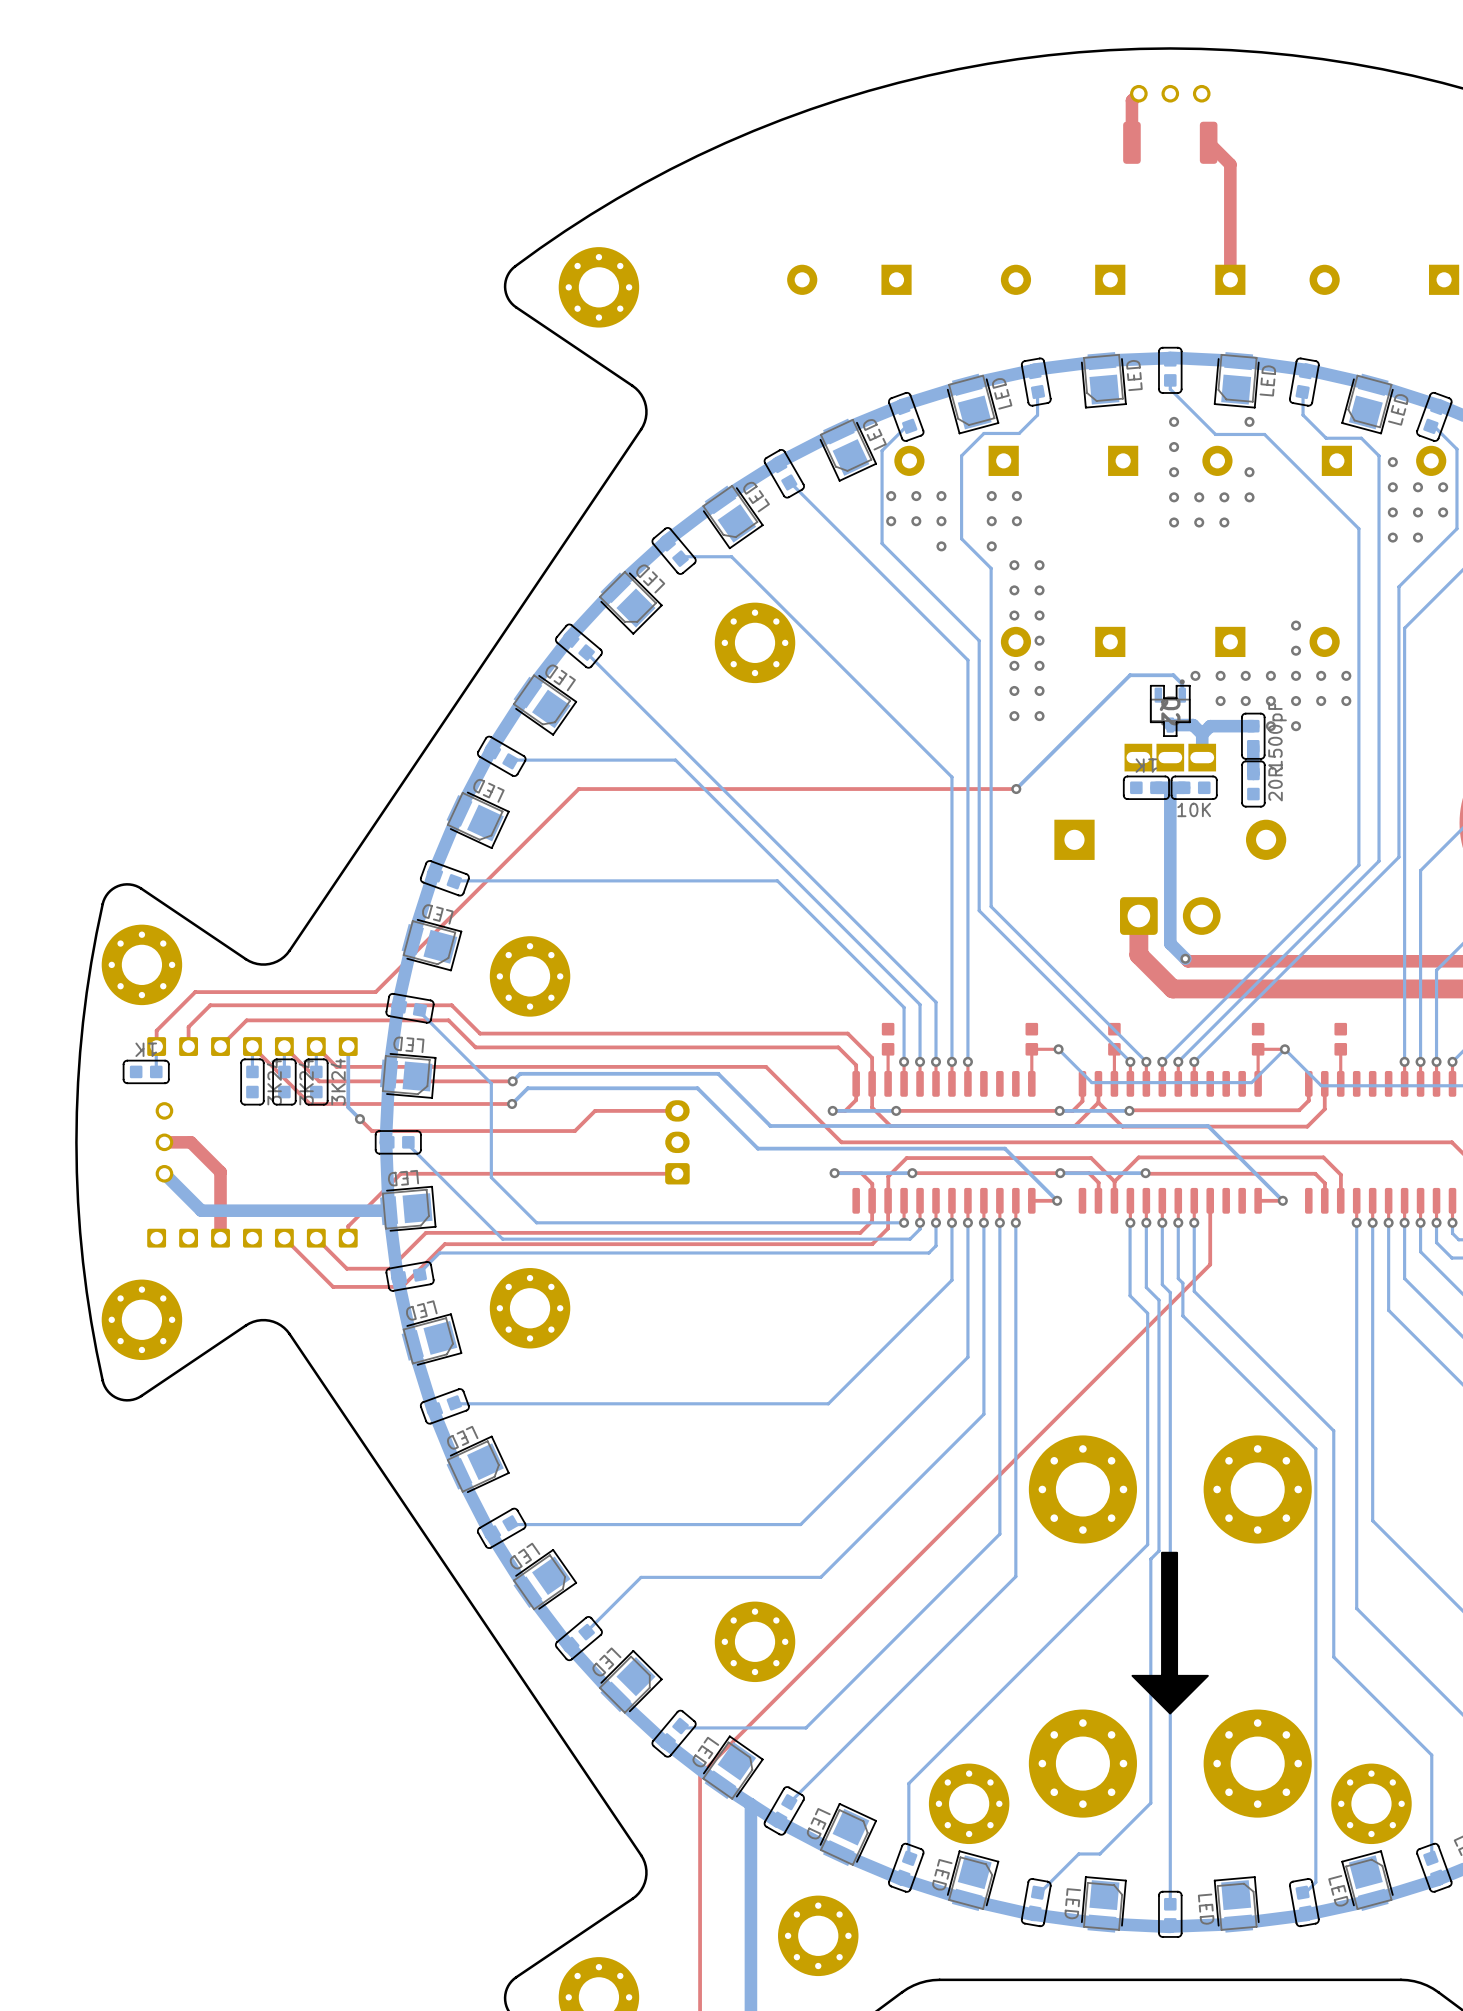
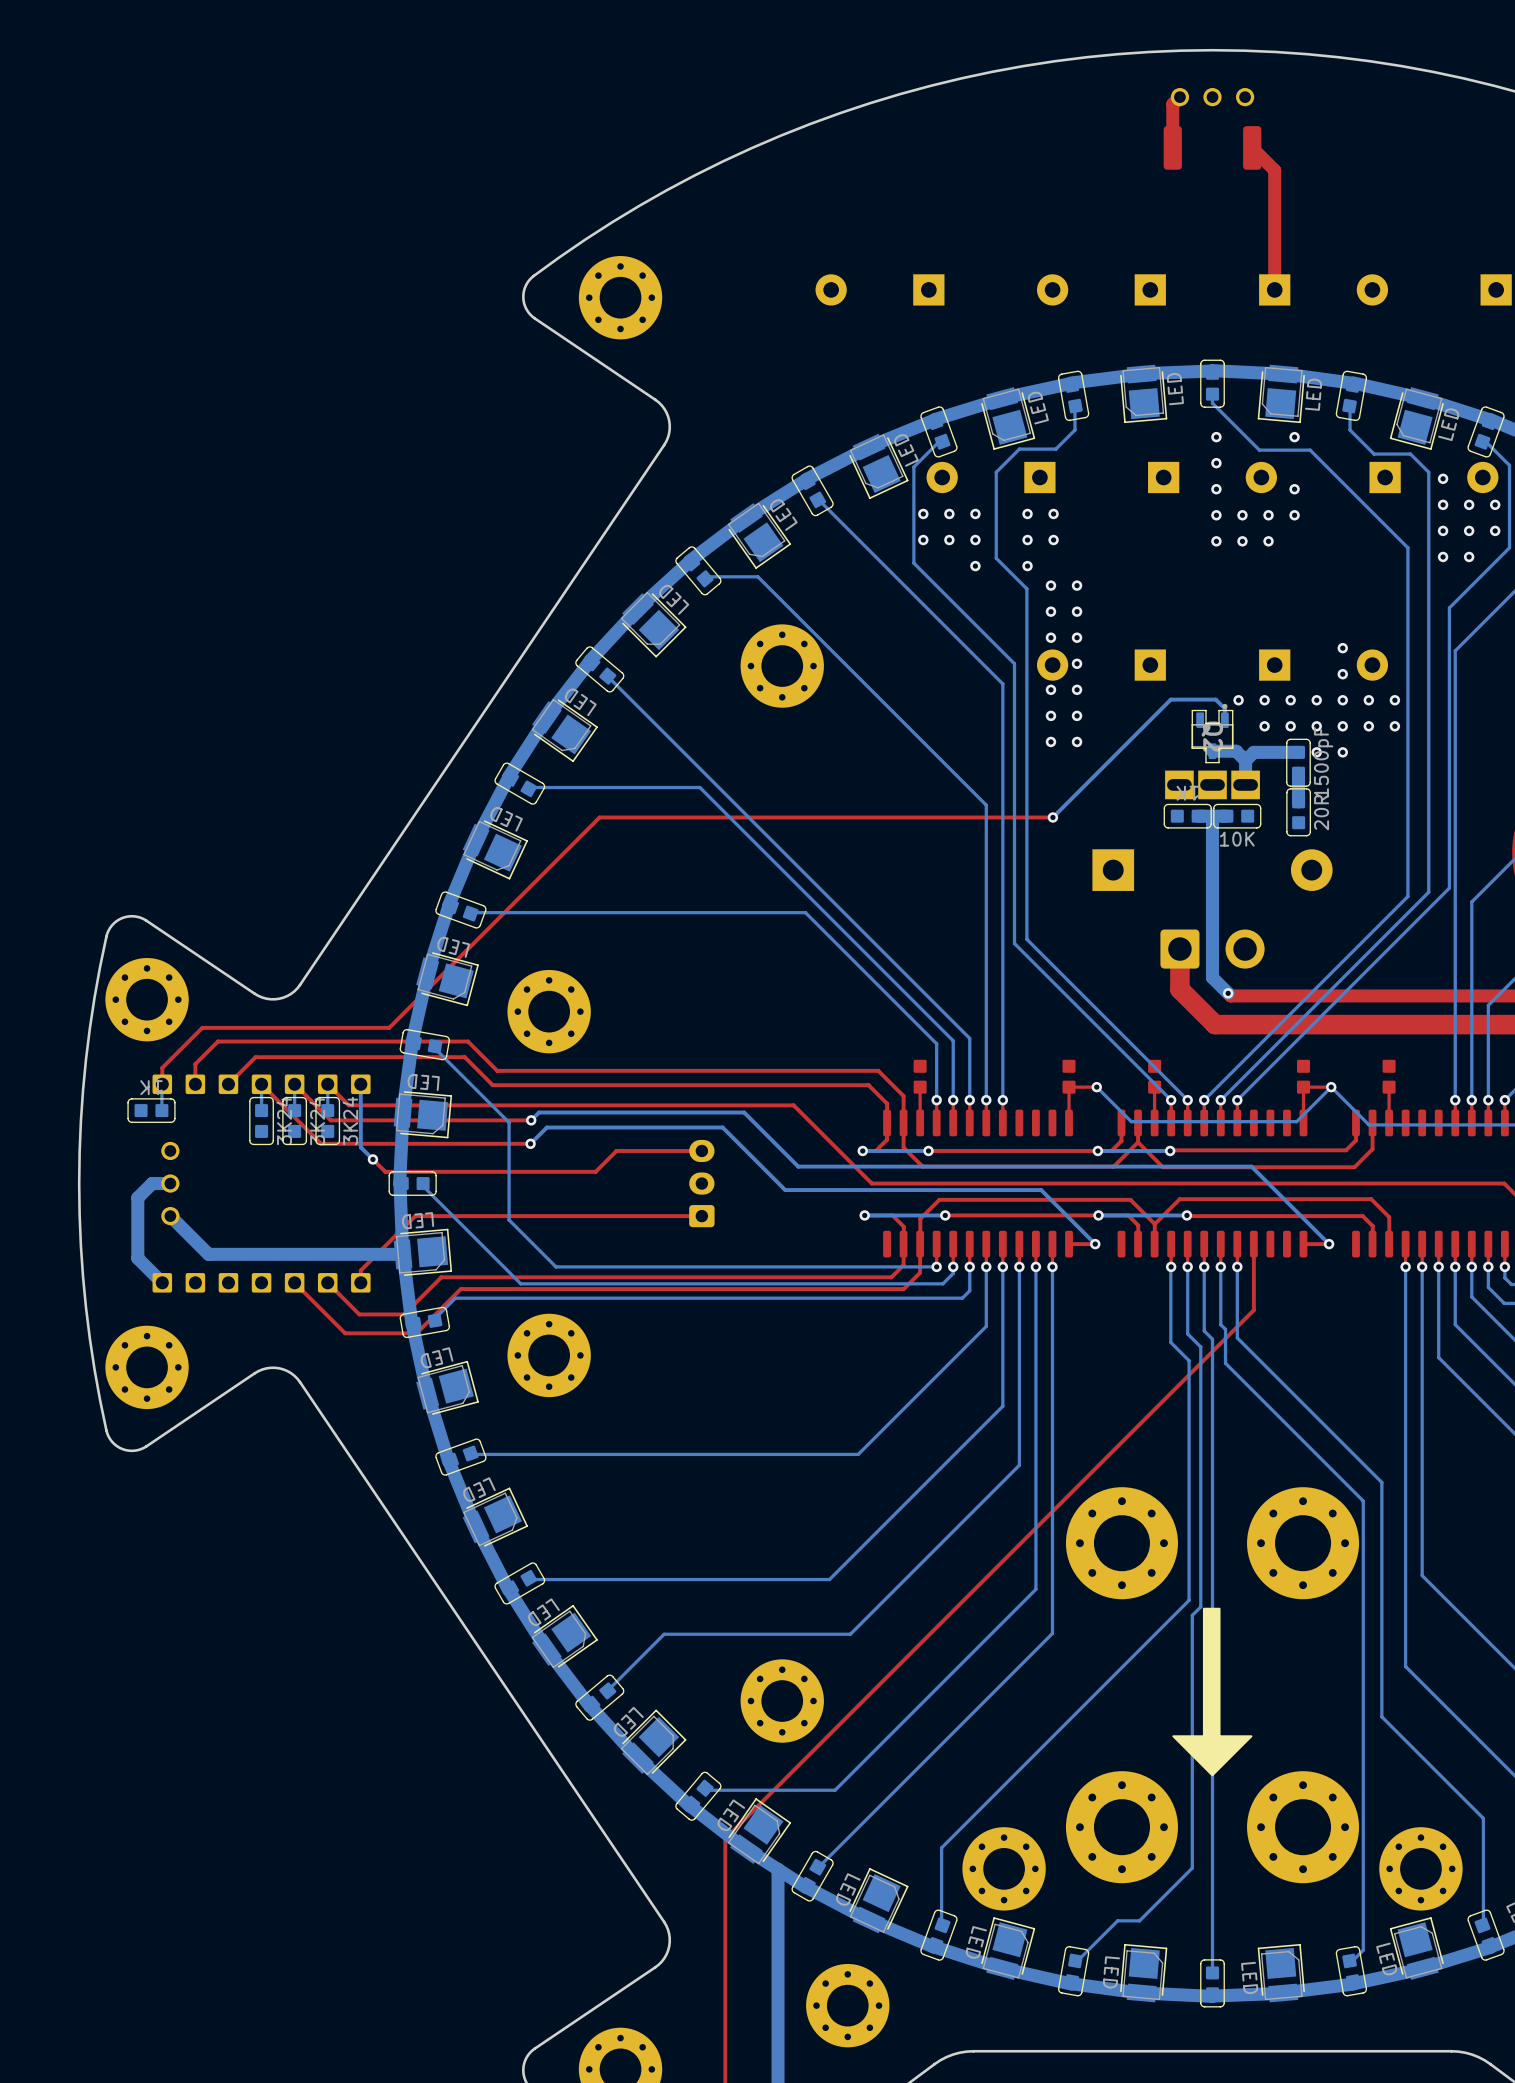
top track: (164, 1142) (190, 1142) (220, 1172) (220, 1238) -> none
bottom track: none -> (170, 1183) (152, 1183) (137, 1197) (137, 1258) (162, 1282)

